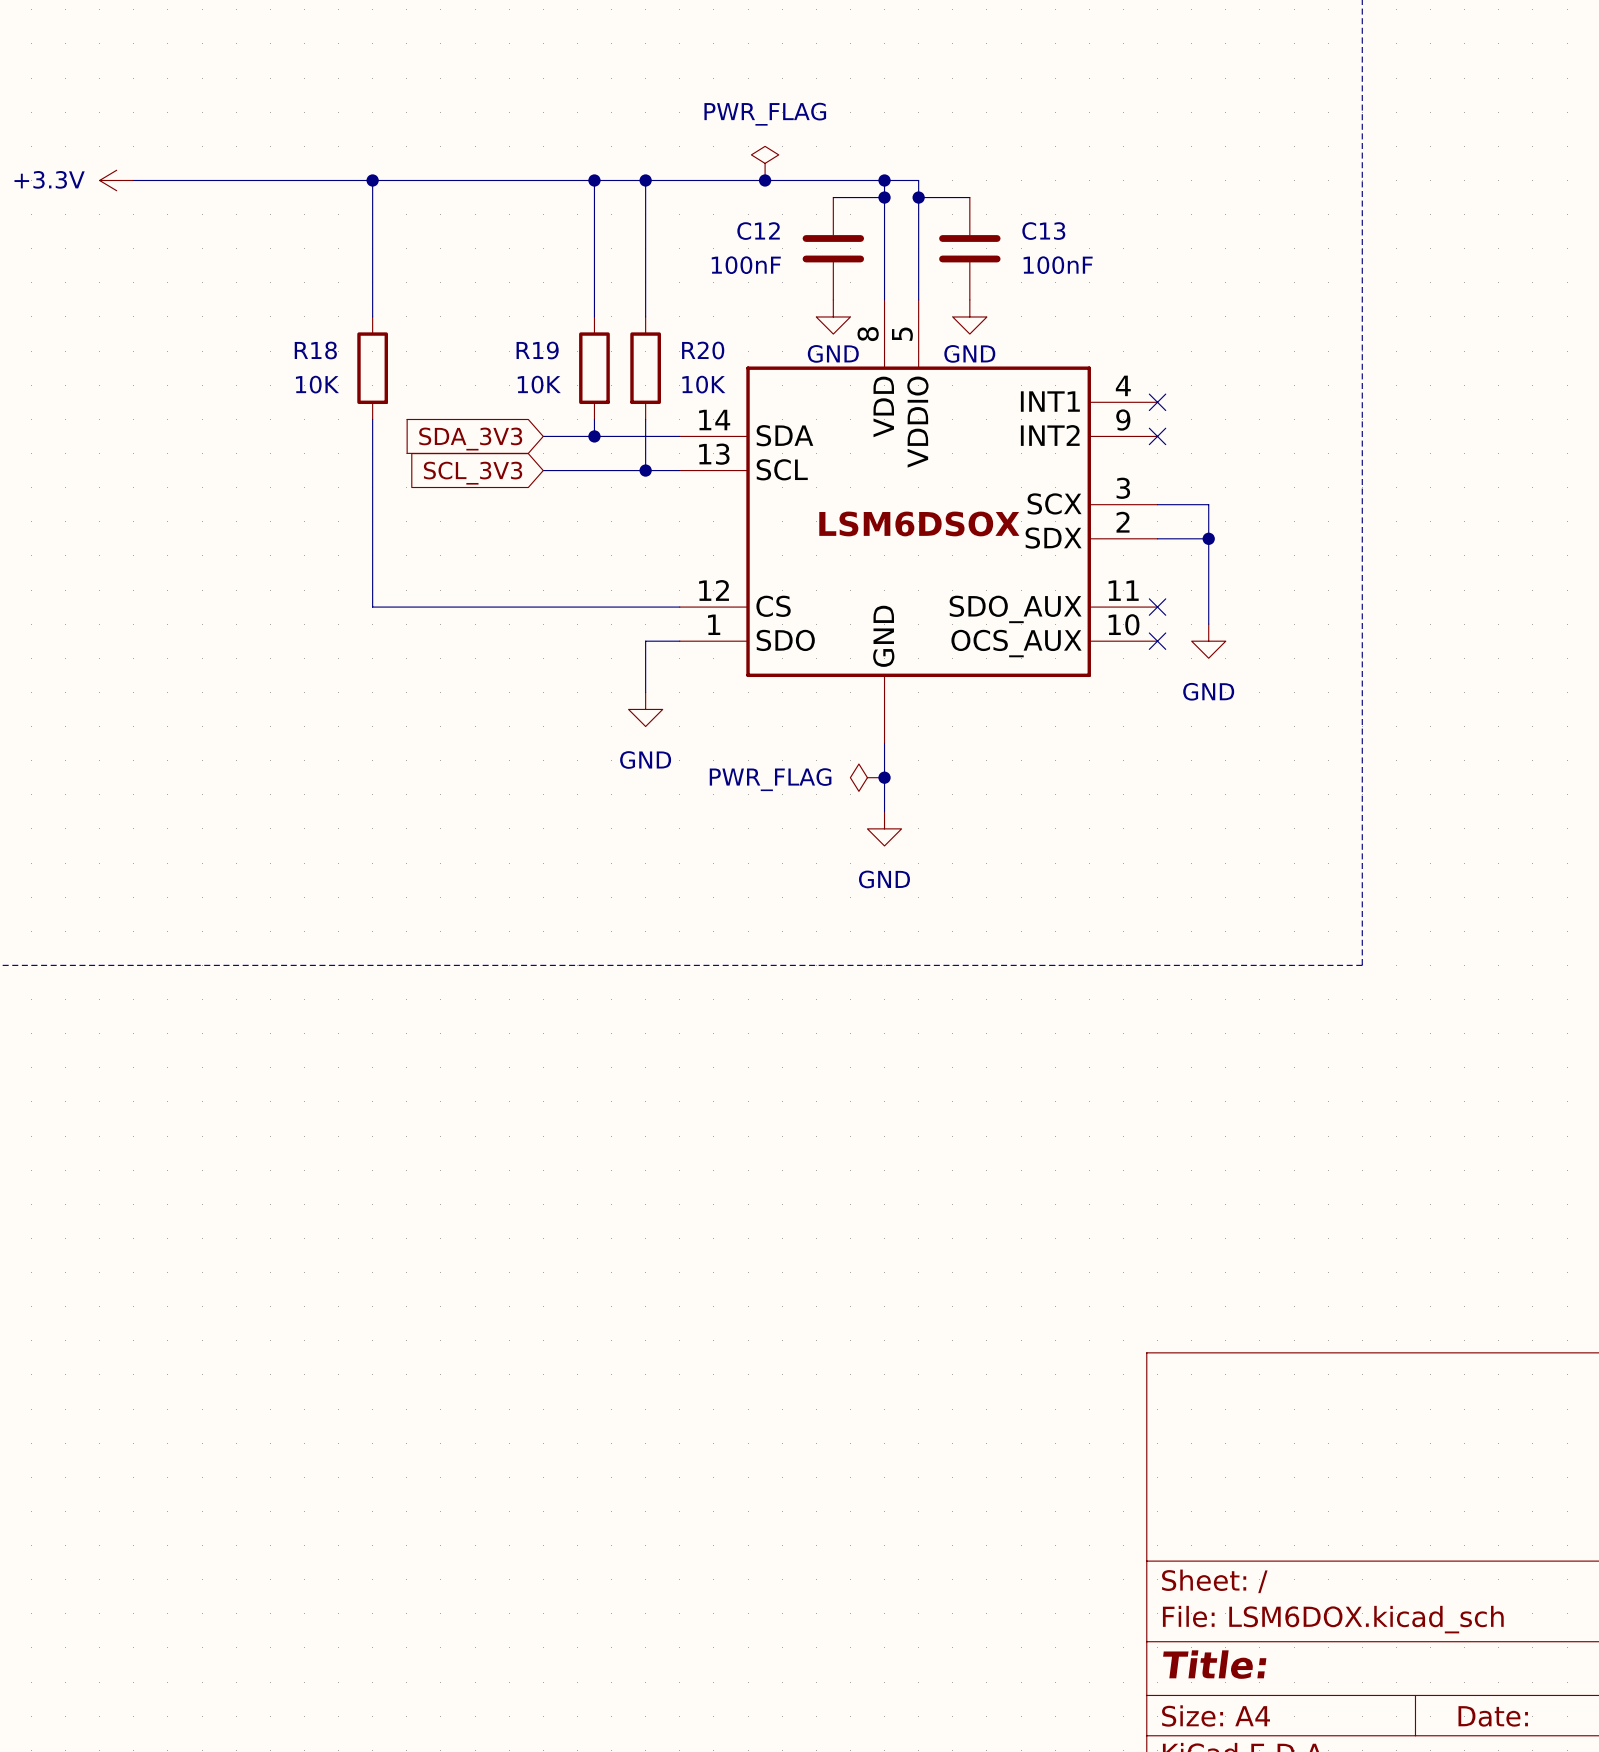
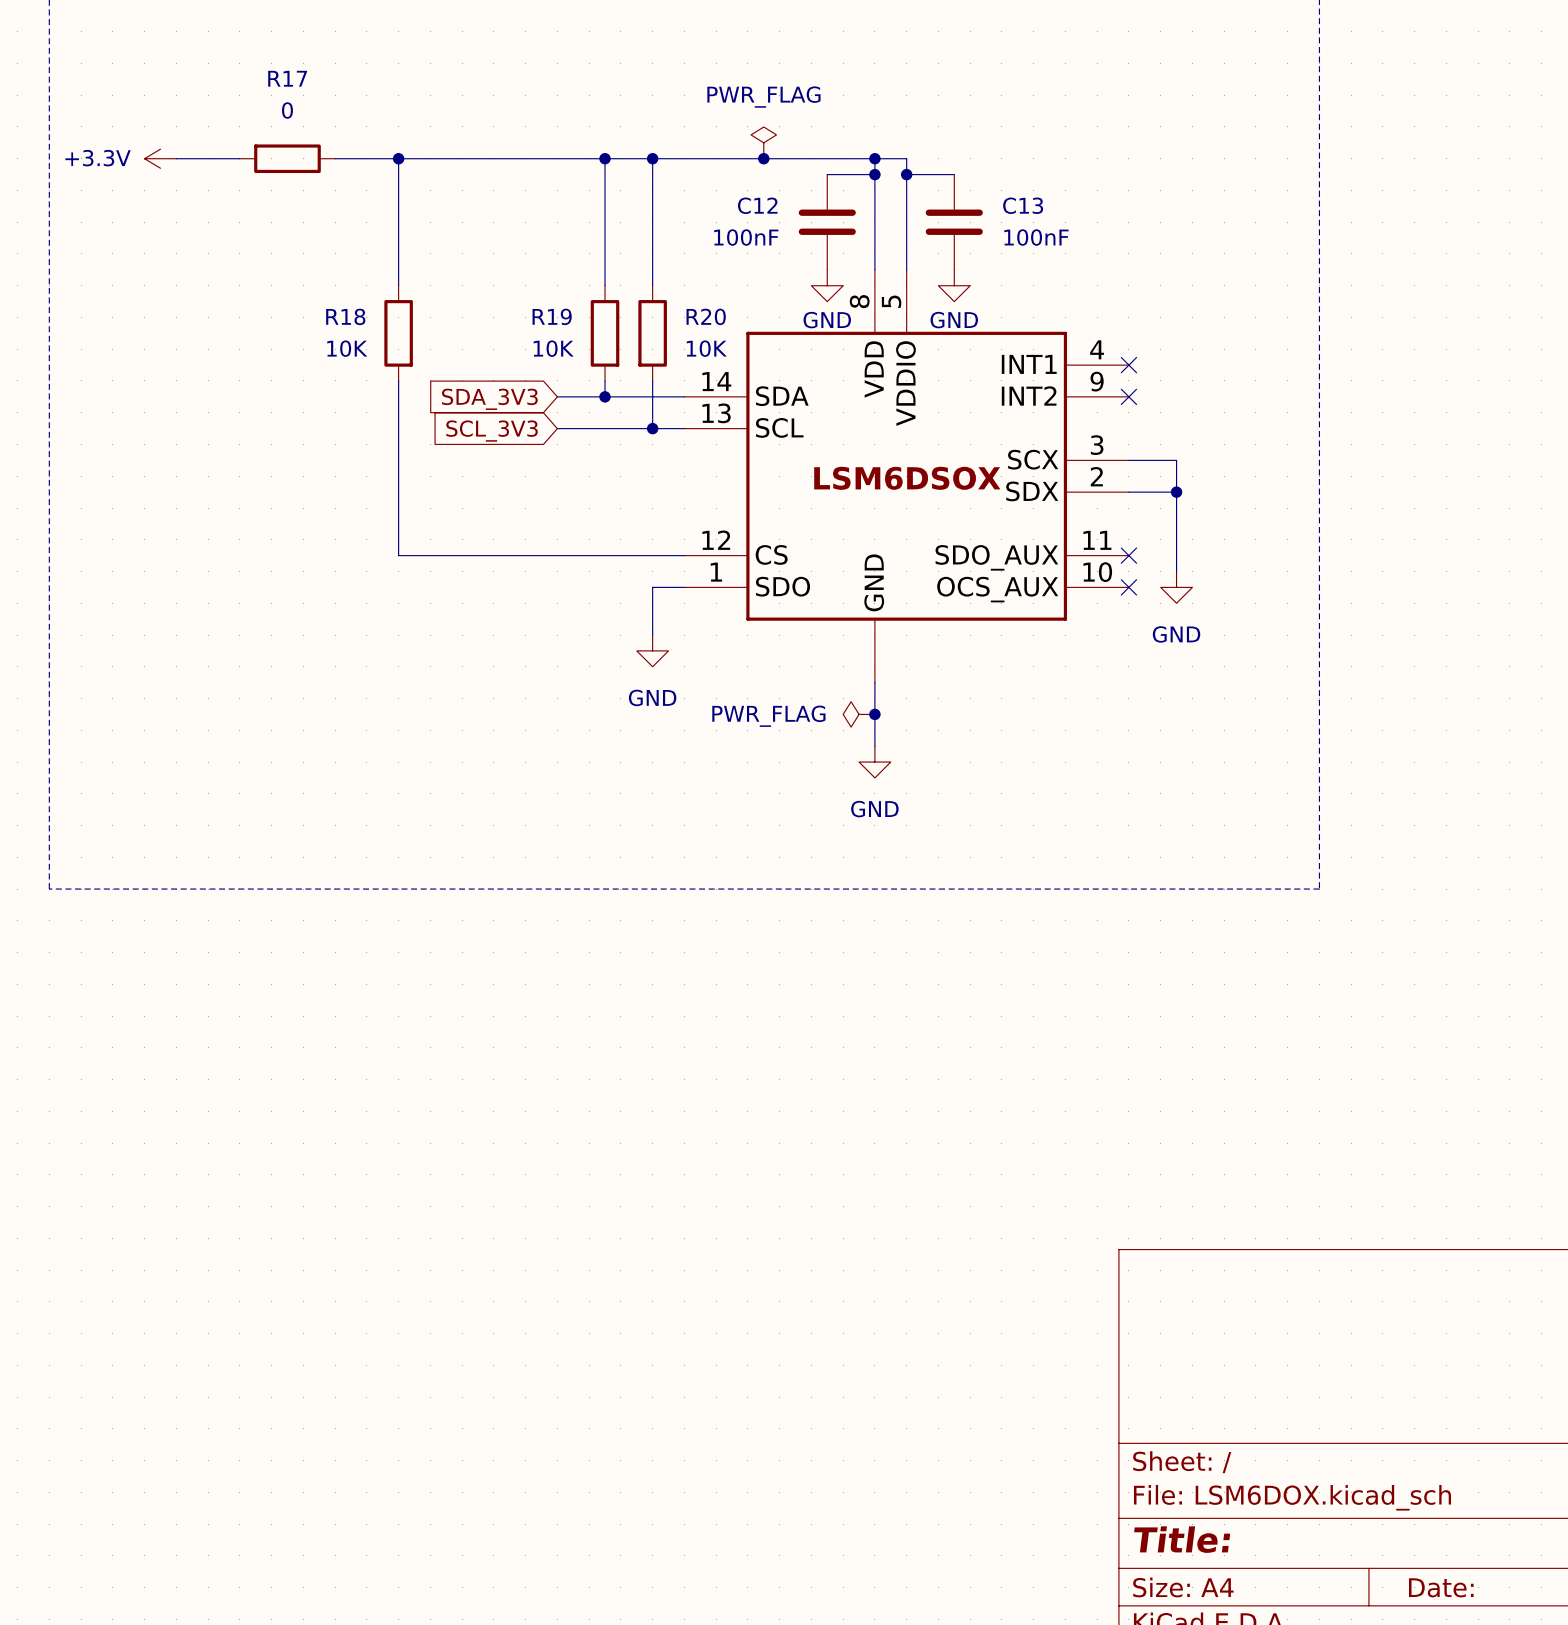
wire: (202, 180) (304, 180) -> none
R17: none -> 0 (287, 158)

